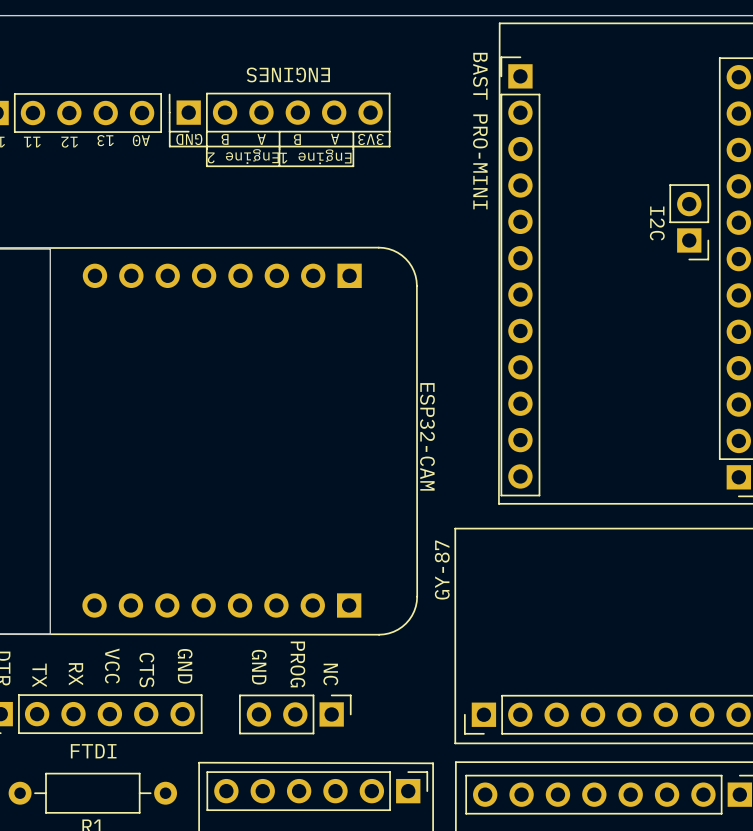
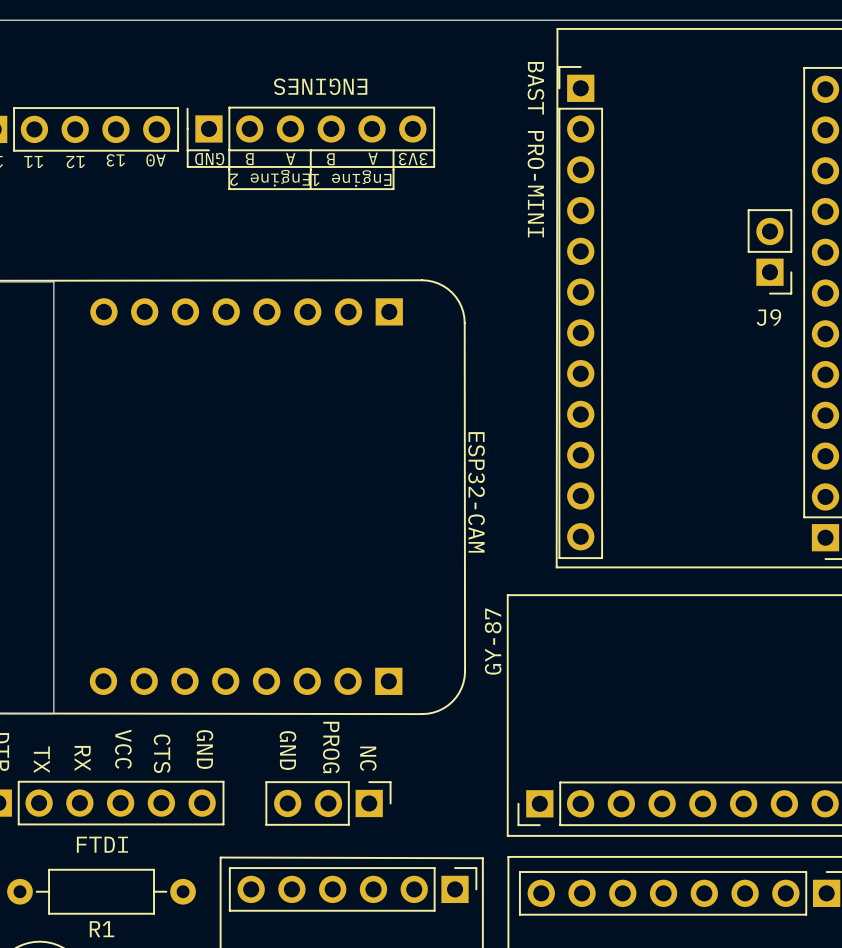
text: I2C (657, 223) -> none
J9 name: none -> J9 (768, 317)

